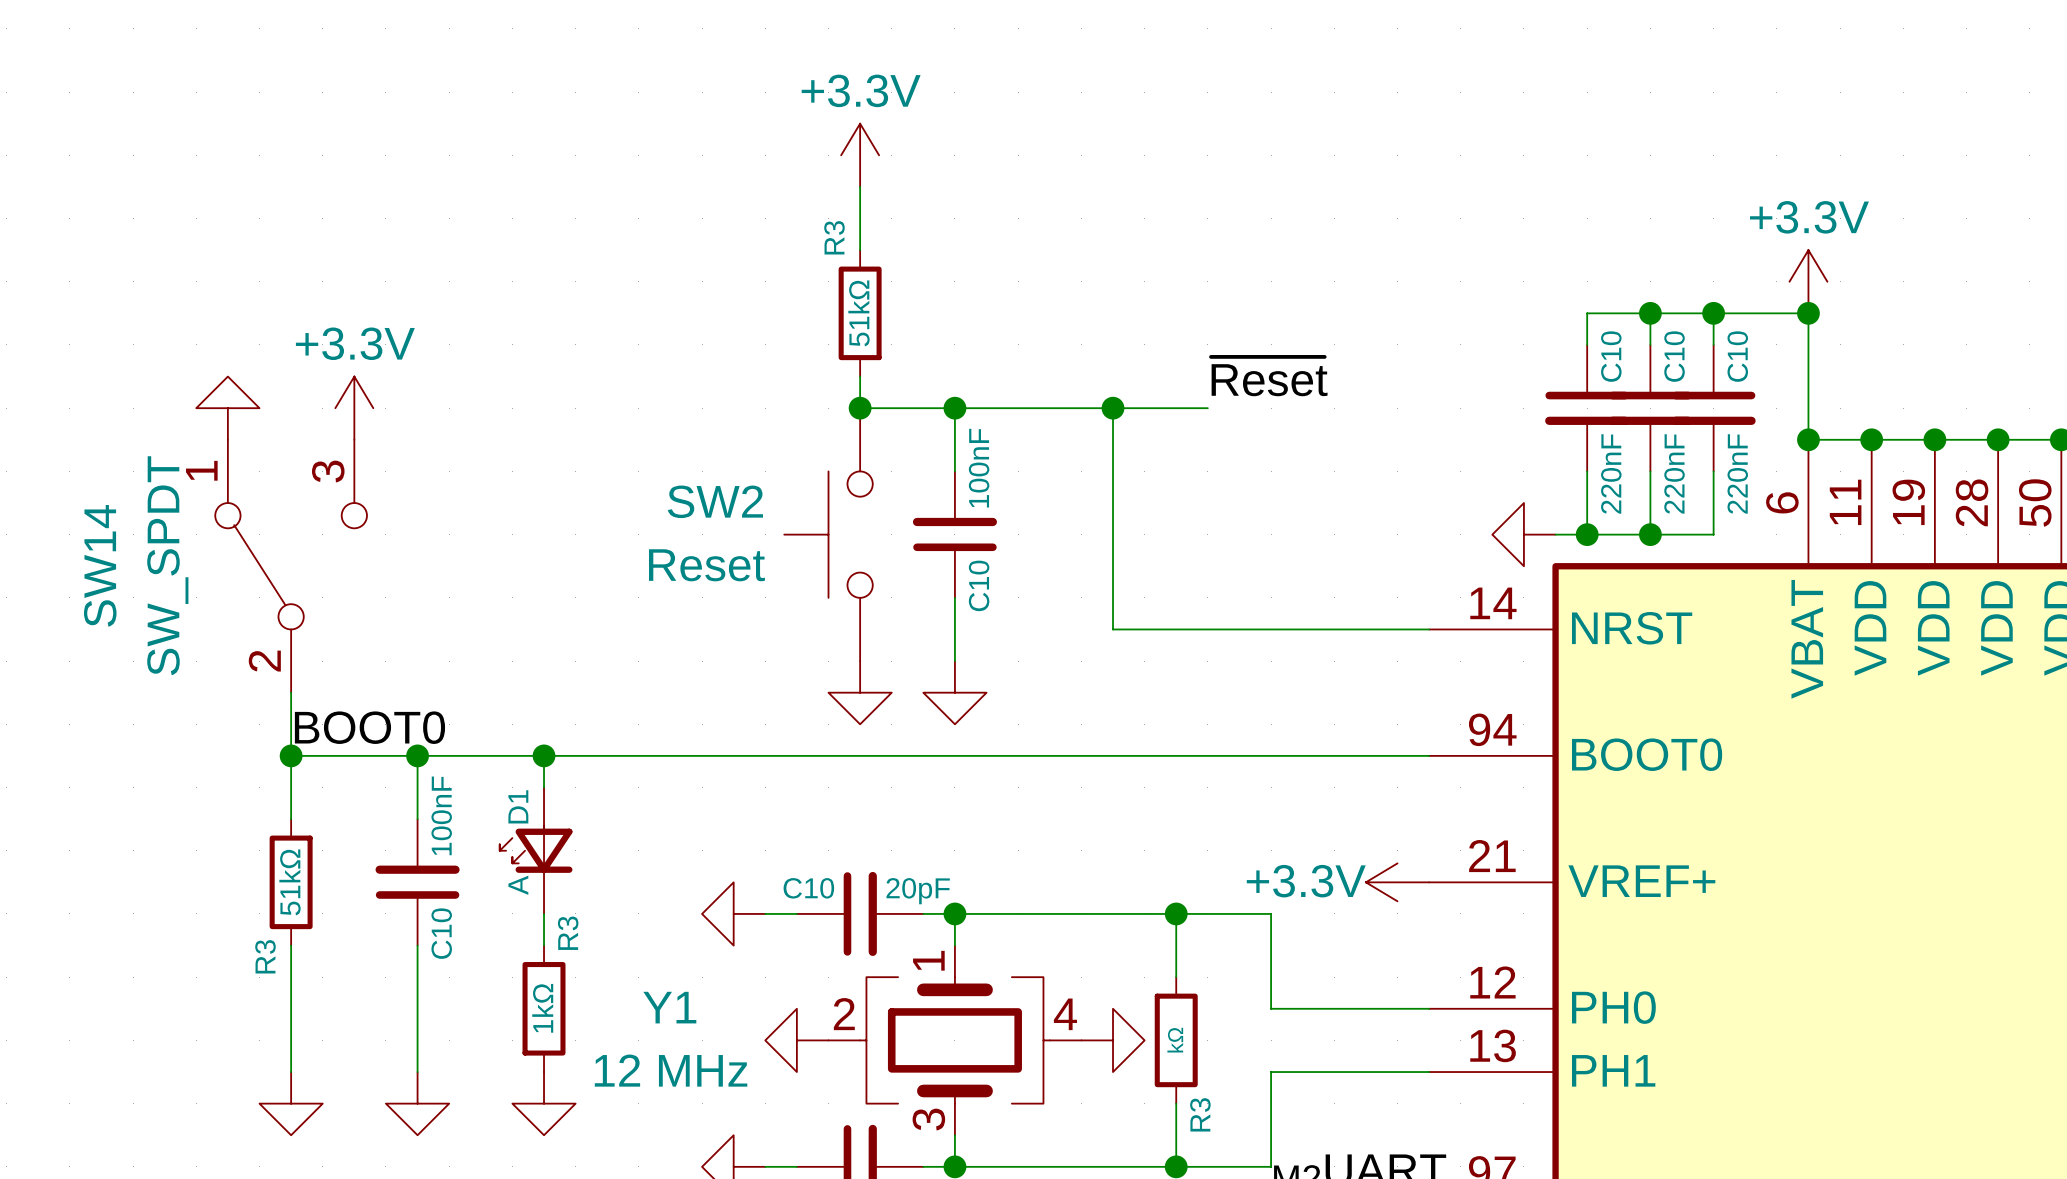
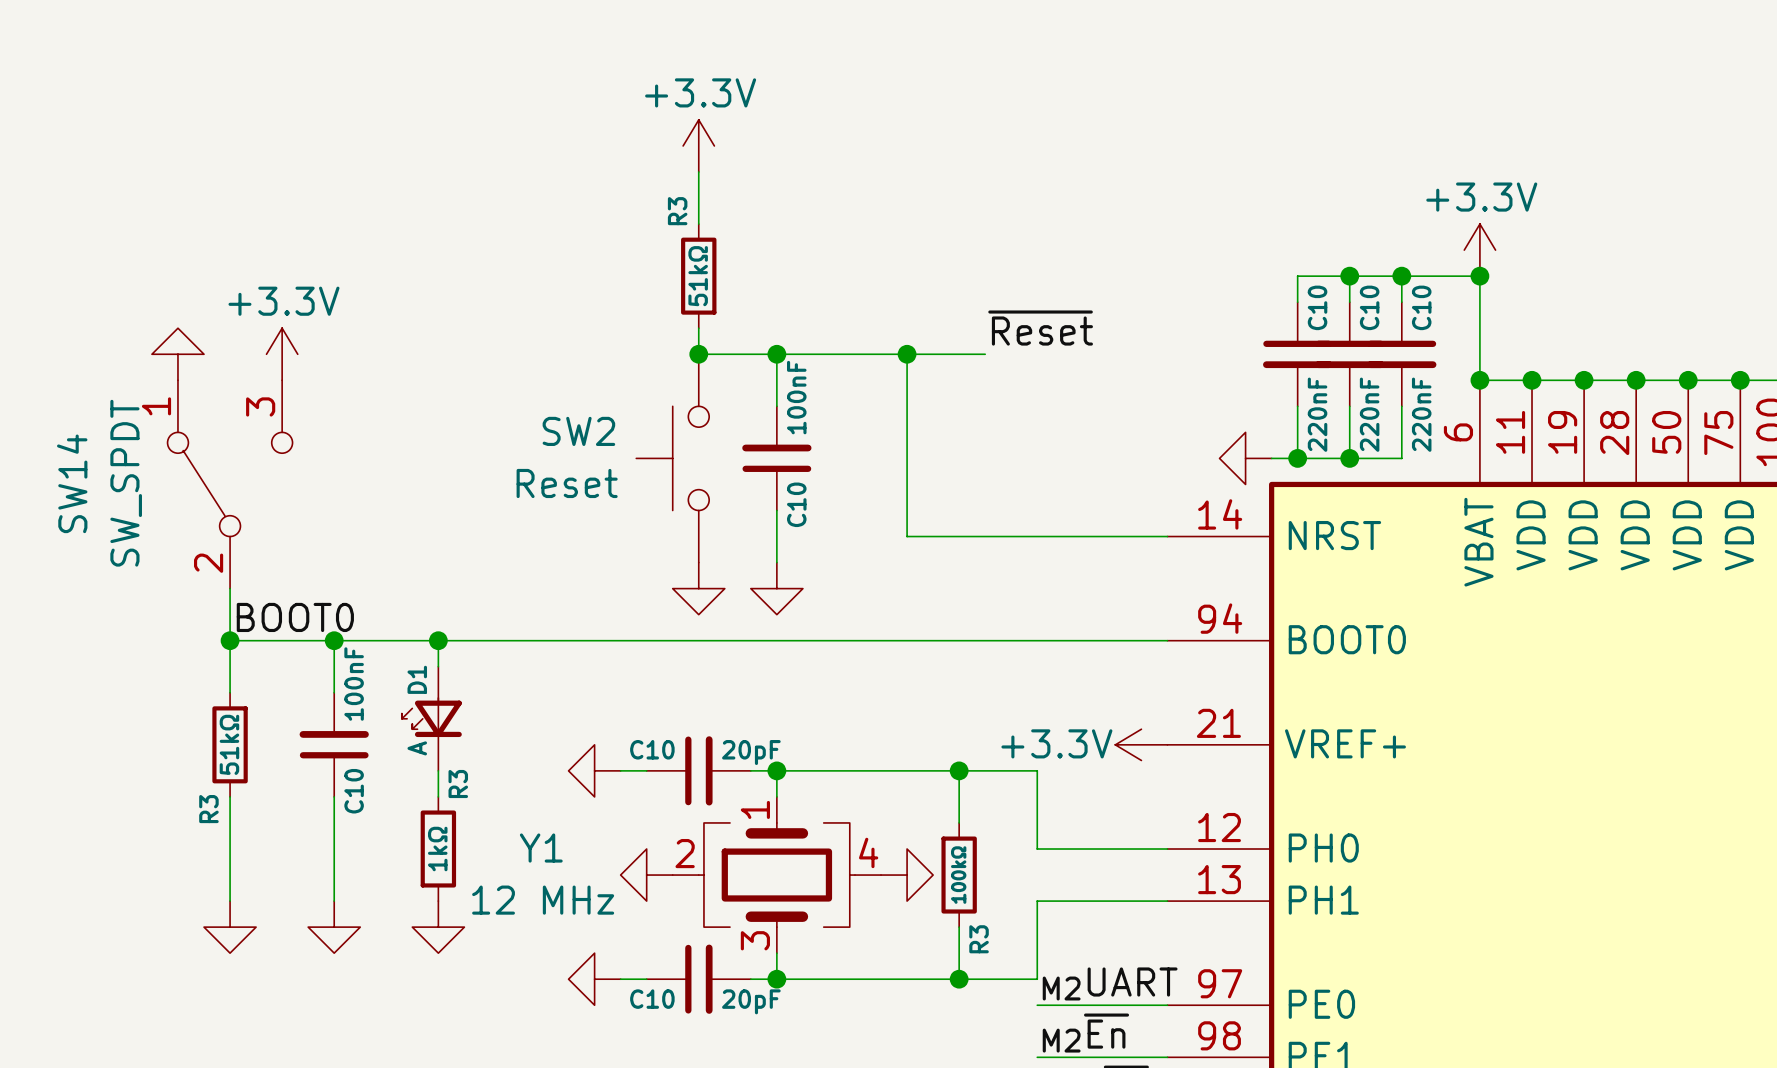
R3 value: kΩ (1175, 1040) -> 100kΩ (958, 875)

